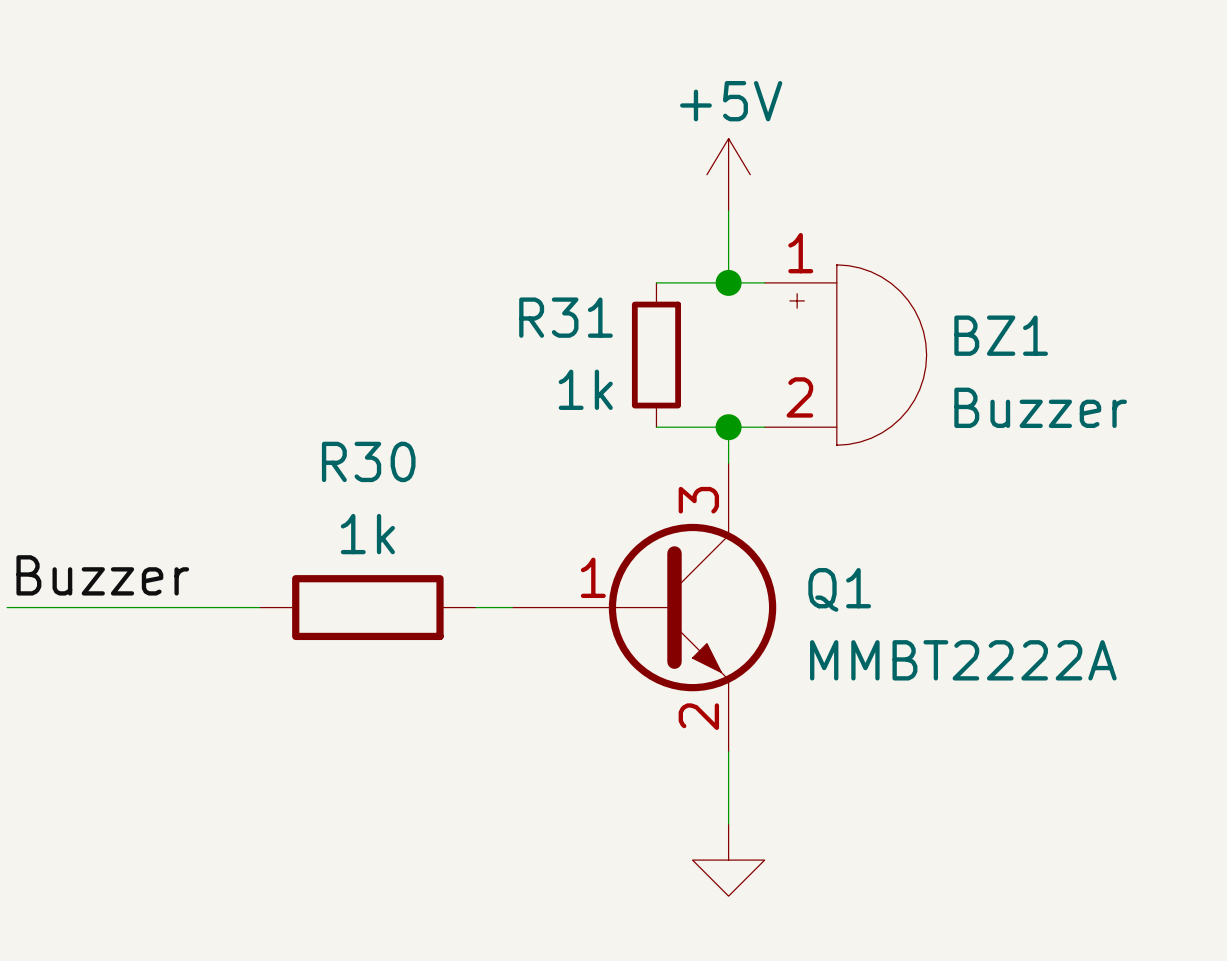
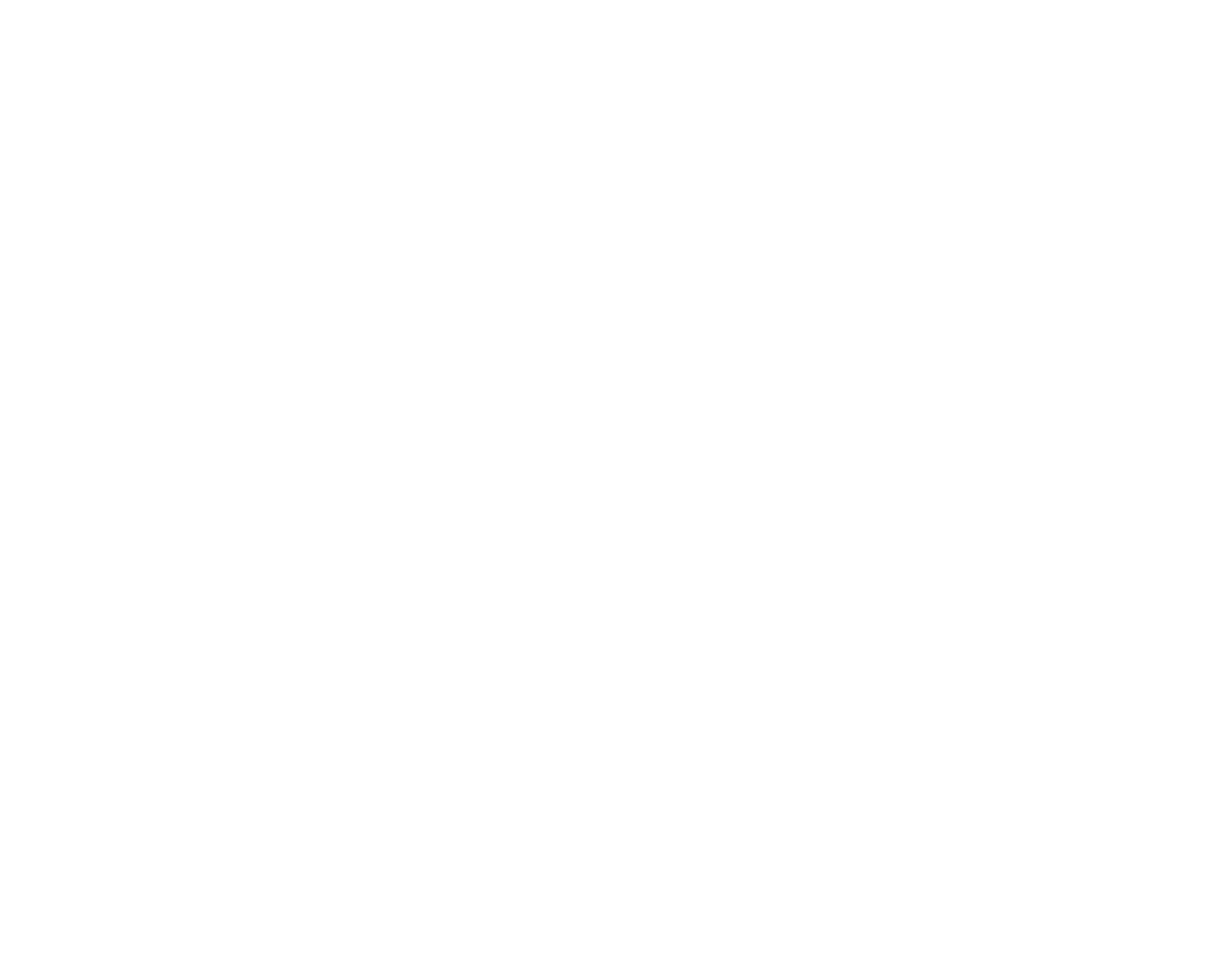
power symbol: +5V (728, 174) -> none
wire: (728, 210) (728, 282) -> none
wire: (656, 282) (764, 282) -> none
junction: (728, 282) -> none
R31: 1k (656, 355) -> none
BZ1: Buzzer (845, 355) -> none
wire: (656, 427) (764, 427) -> none
wire: (728, 427) (728, 463) -> none
junction: (728, 427) -> none
label: Buzzer (102, 575) -> none
wire: (7, 607) (259, 607) -> none
R30: 1k (367, 607) -> none
wire: (476, 607) (512, 607) -> none
Q1: MMBT2222A (644, 607) -> none
wire: (728, 751) (728, 824) -> none
power symbol: (728, 860) -> none

